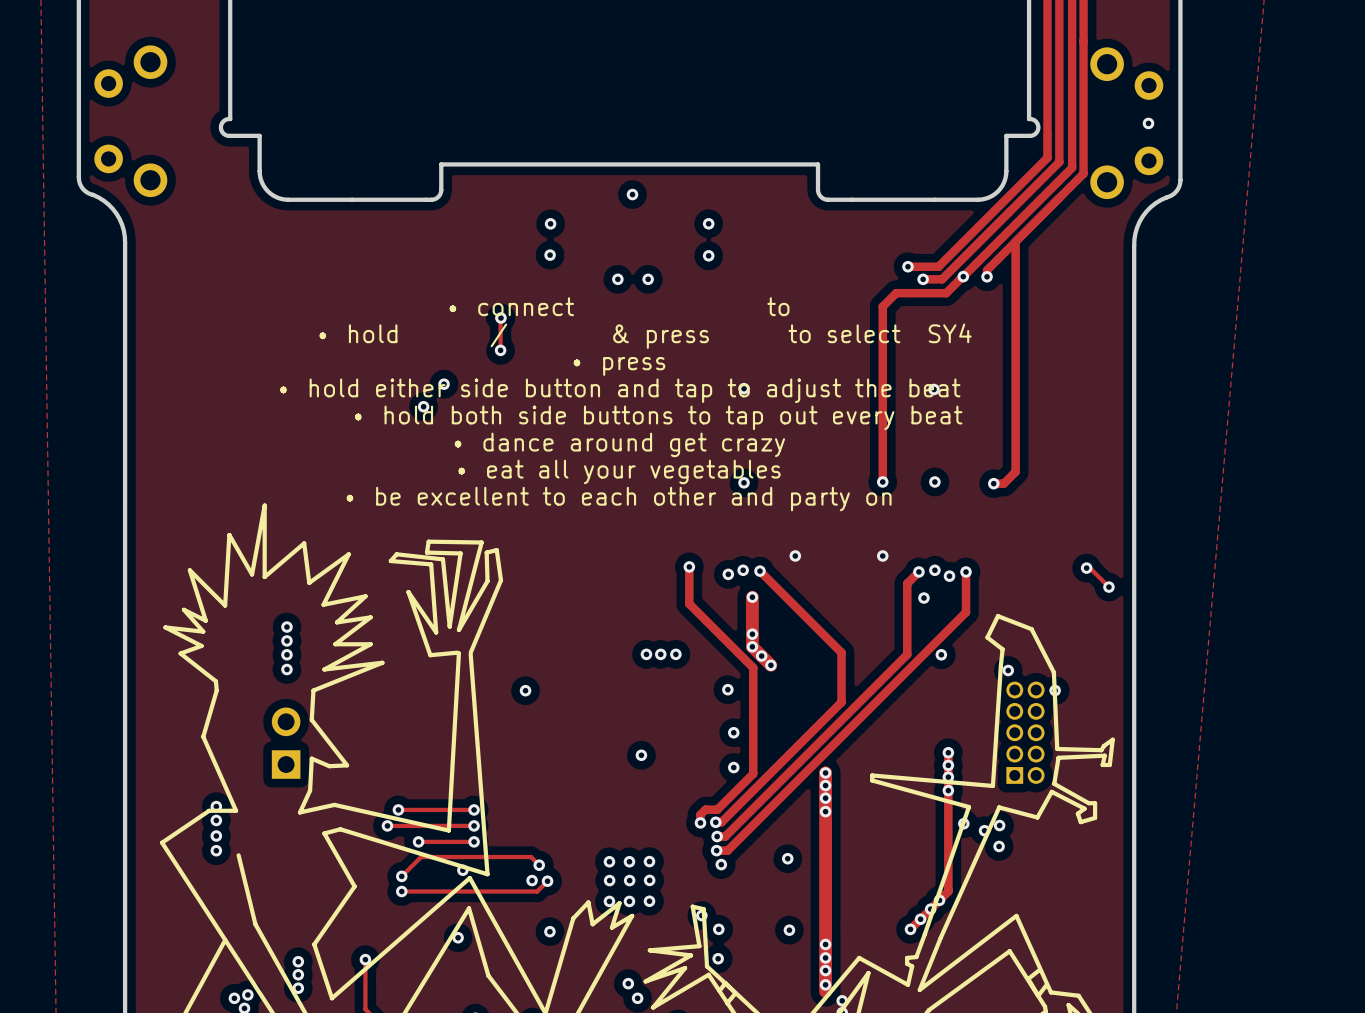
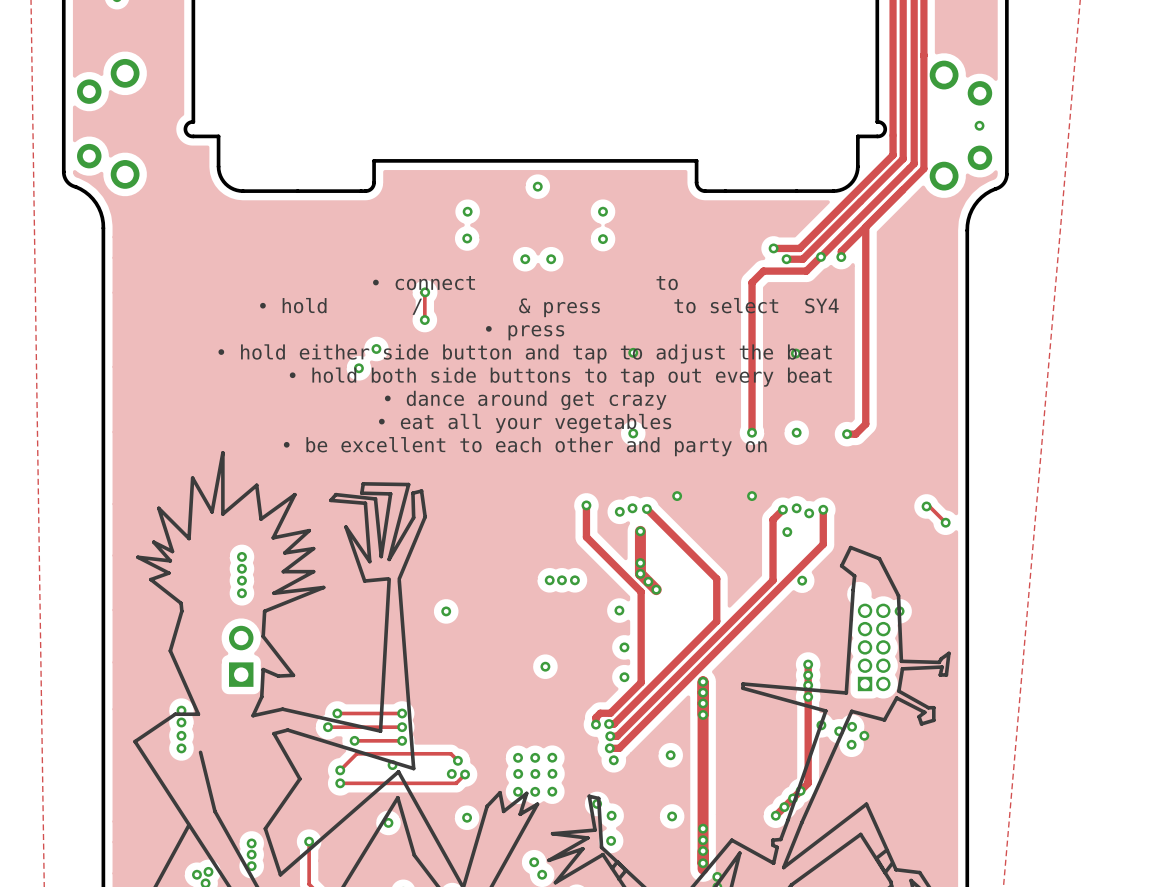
via: (1008, 670) -> none
via: none -> (864, 735)

